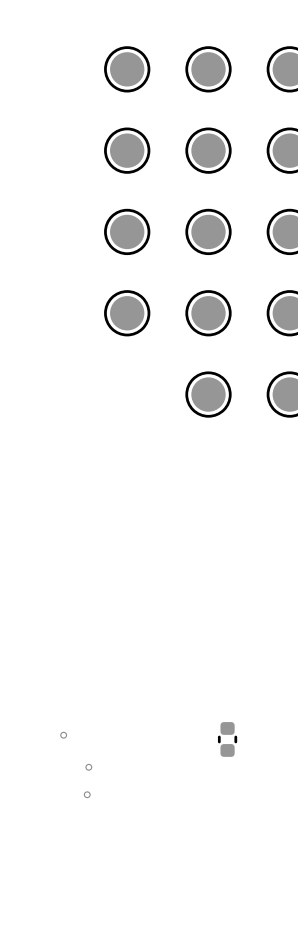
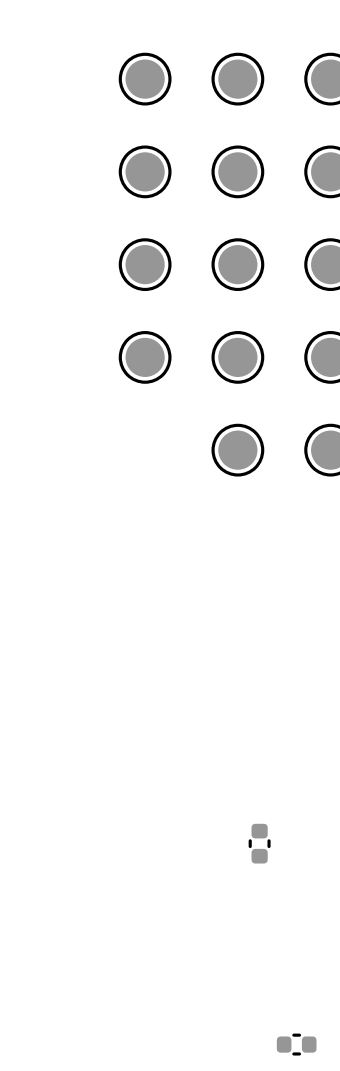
via: (63, 735) -> none
via: (88, 767) -> none
via: (87, 794) -> none
part: none -> (296, 1044)

